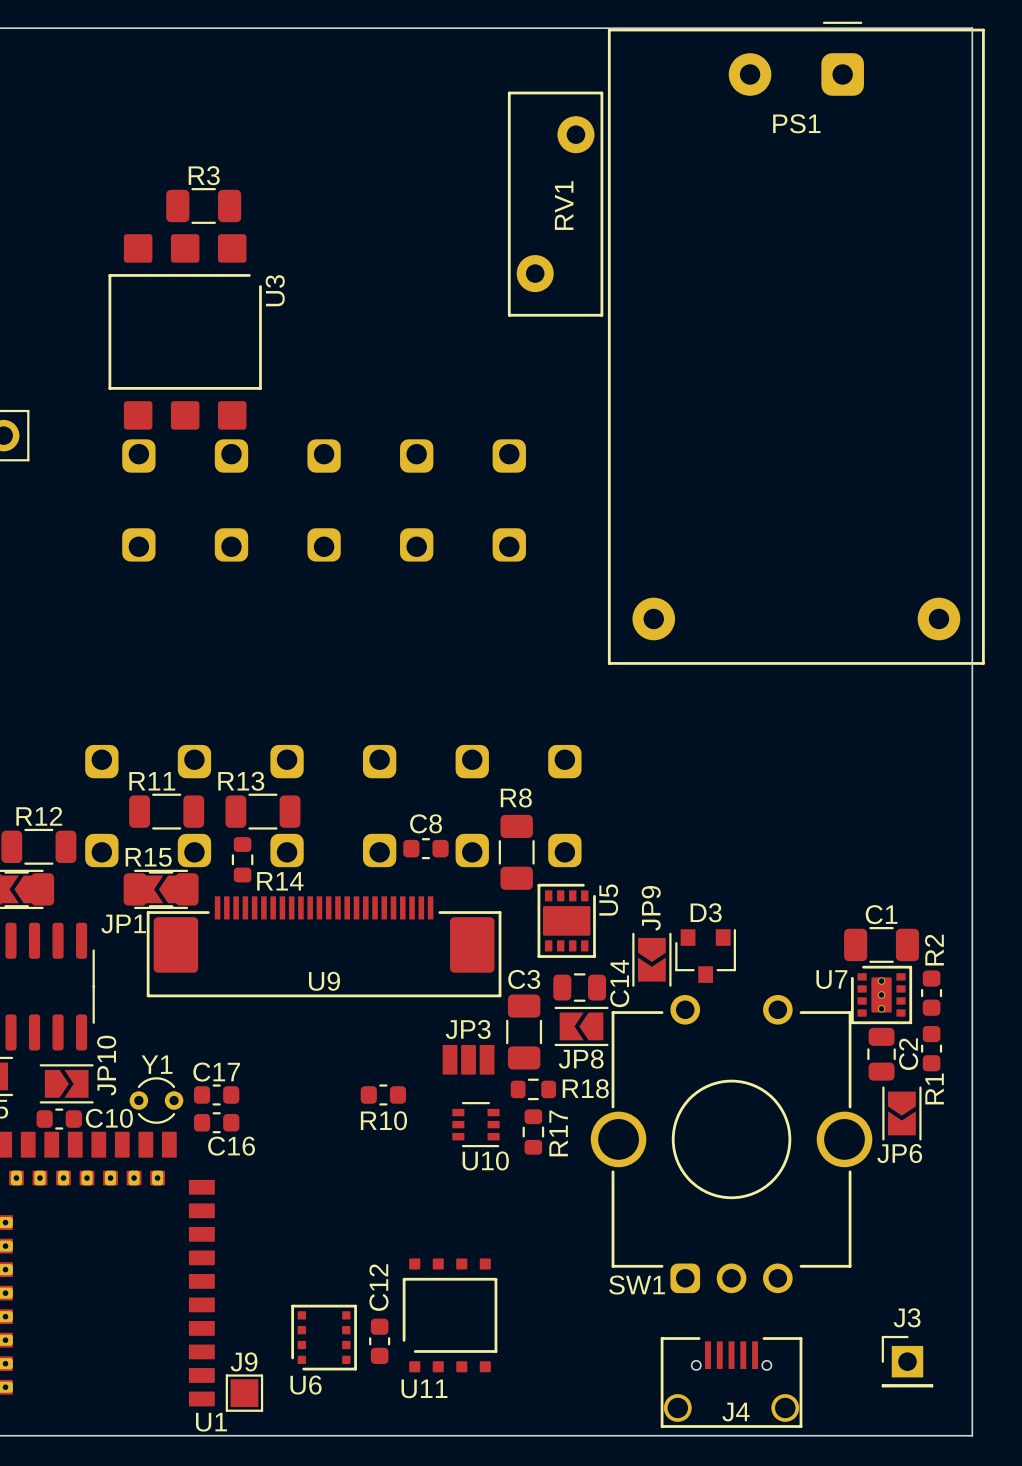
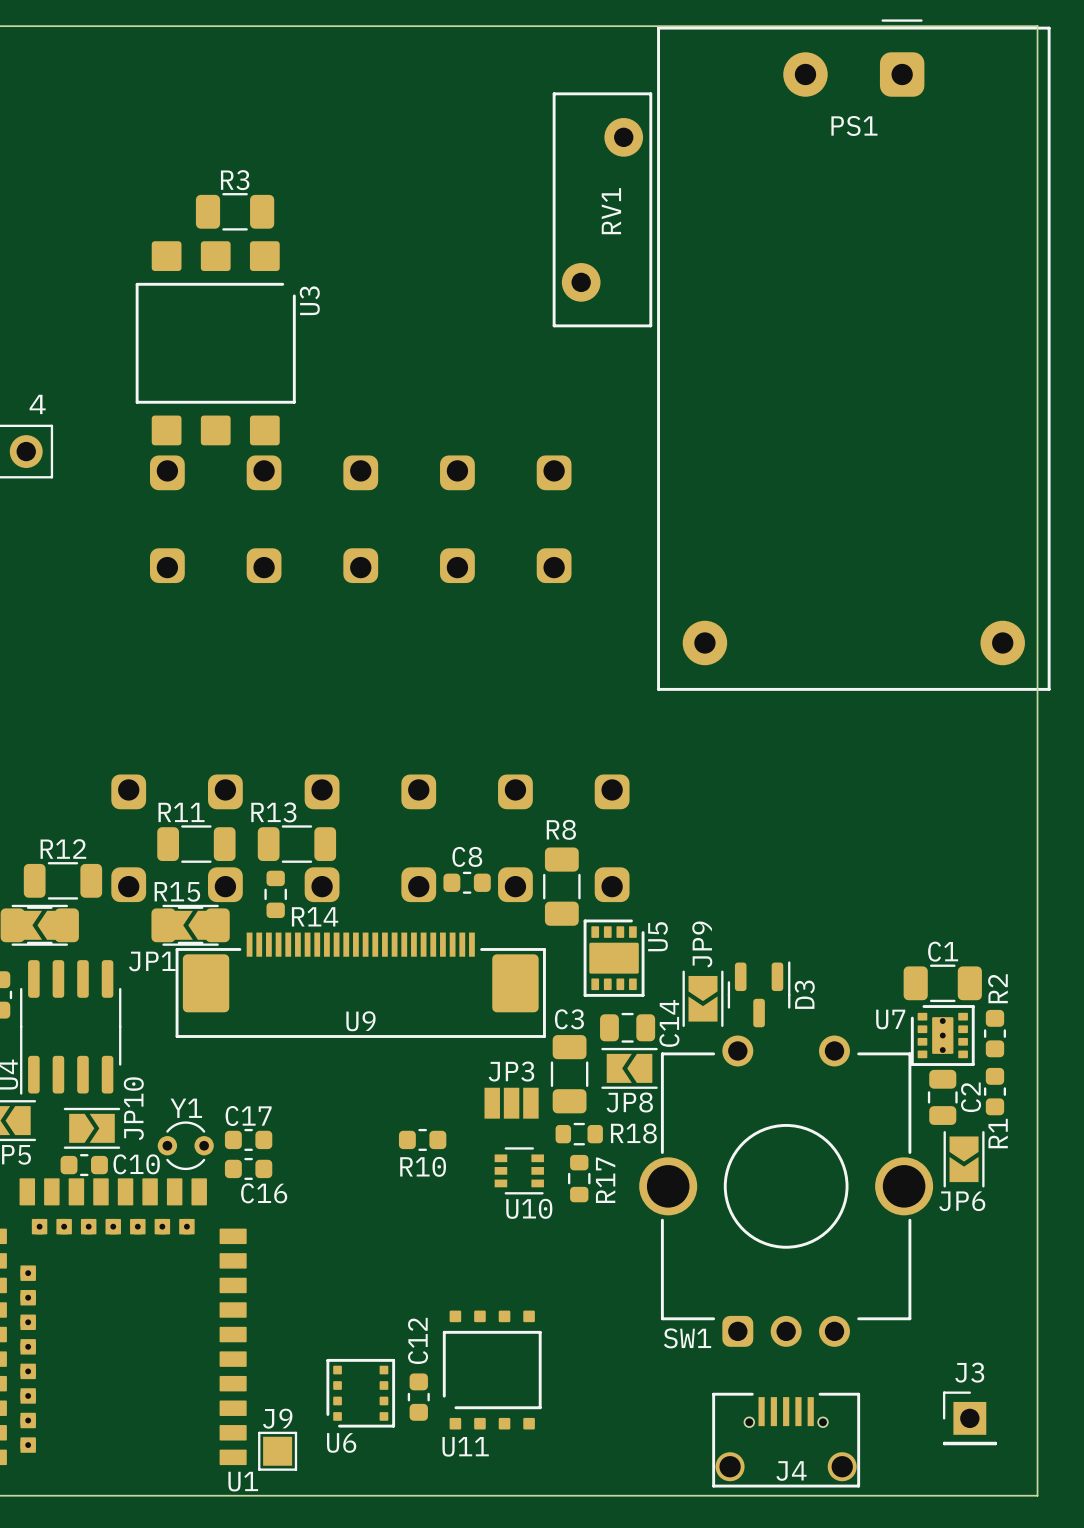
D3 name rotation: 0° (706, 912) -> 90° counterclockwise (804, 994)
D3 name position: D3 (706, 912) -> D3 (804, 994)
D3 footprint: [675, 929, 736, 983] -> [727, 961, 791, 1028]

